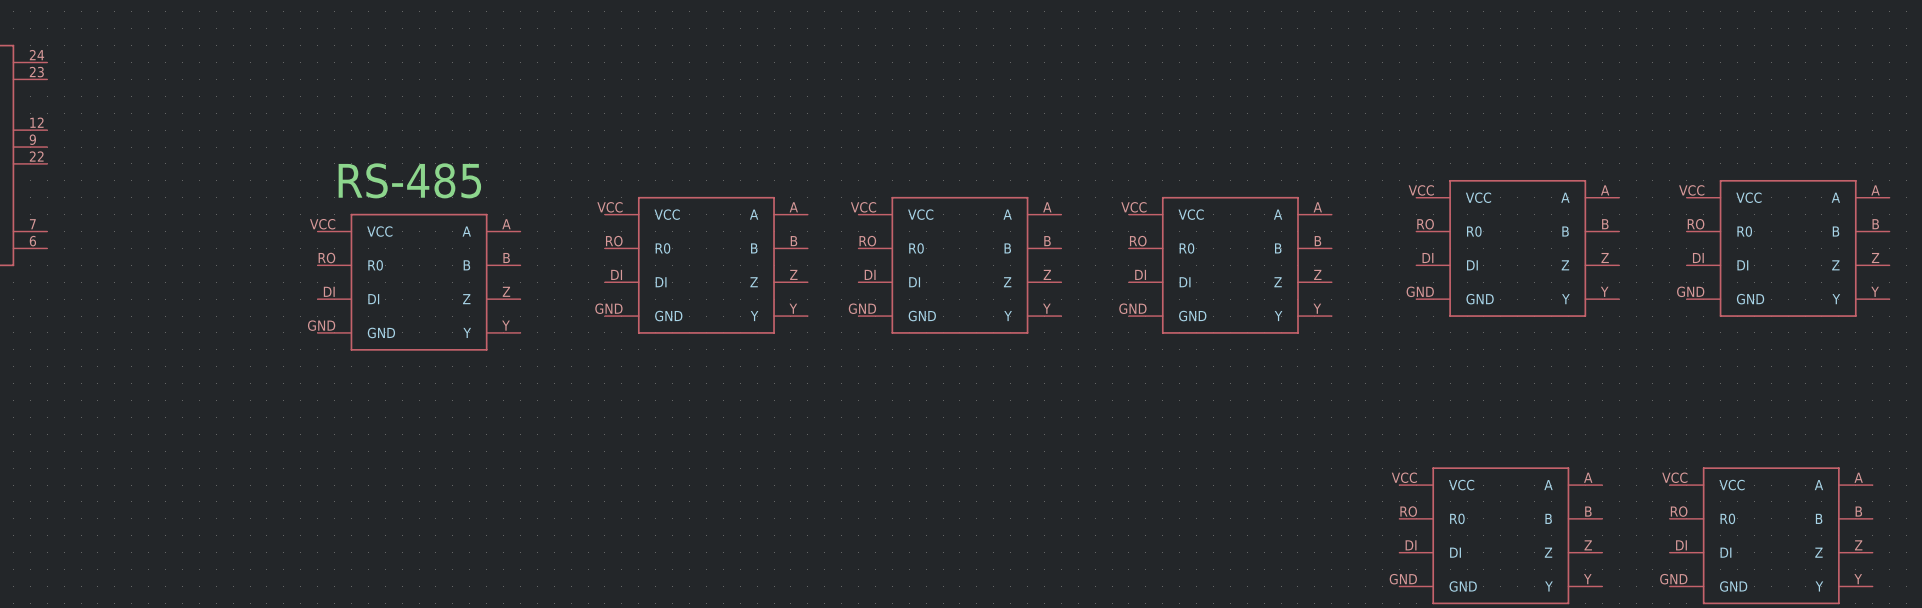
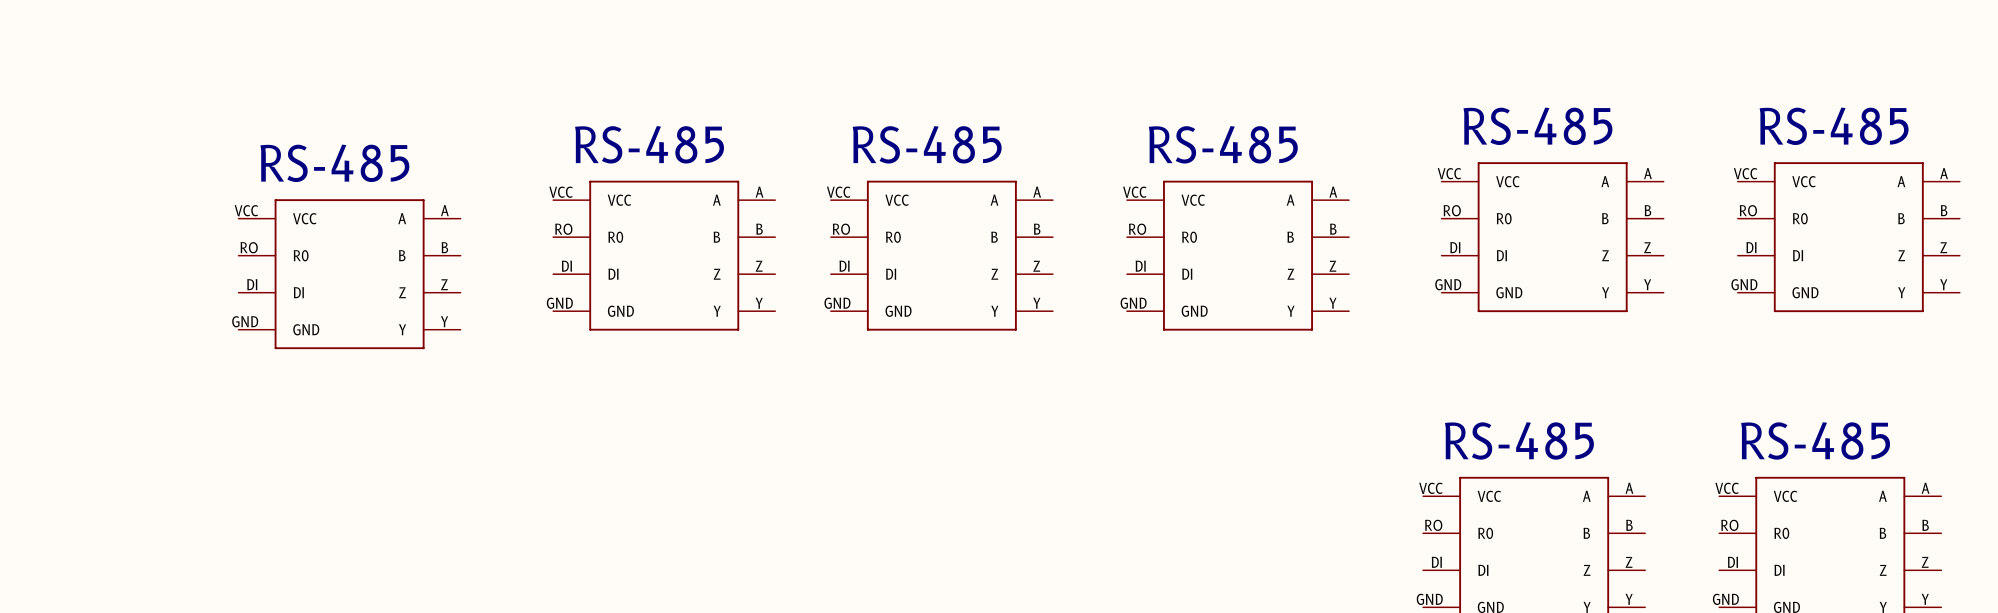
text: none -> RS-485 (1537, 126)
text: none -> RS-485 (1834, 126)
text: none -> RS-485 (649, 144)
text: none -> RS-485 (927, 144)
text: none -> RS-485 (1223, 144)
text: none -> RS-485 (1519, 440)
text: none -> RS-485 (1815, 440)

